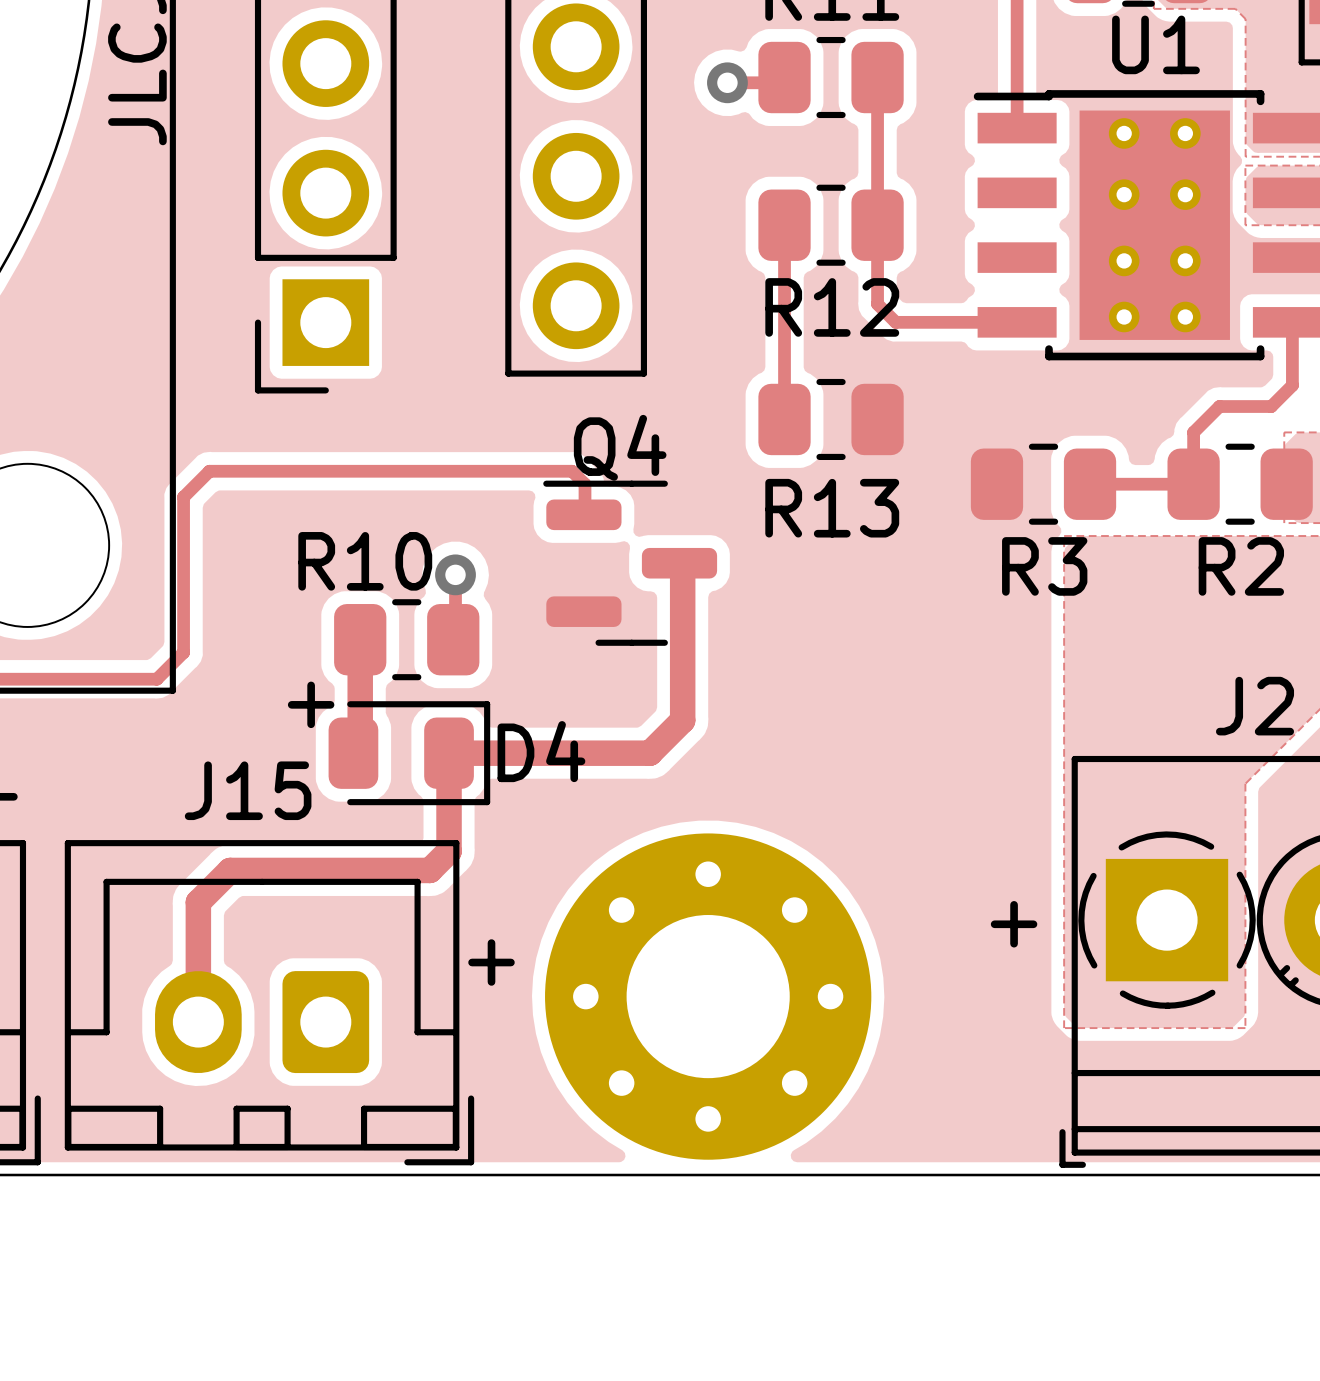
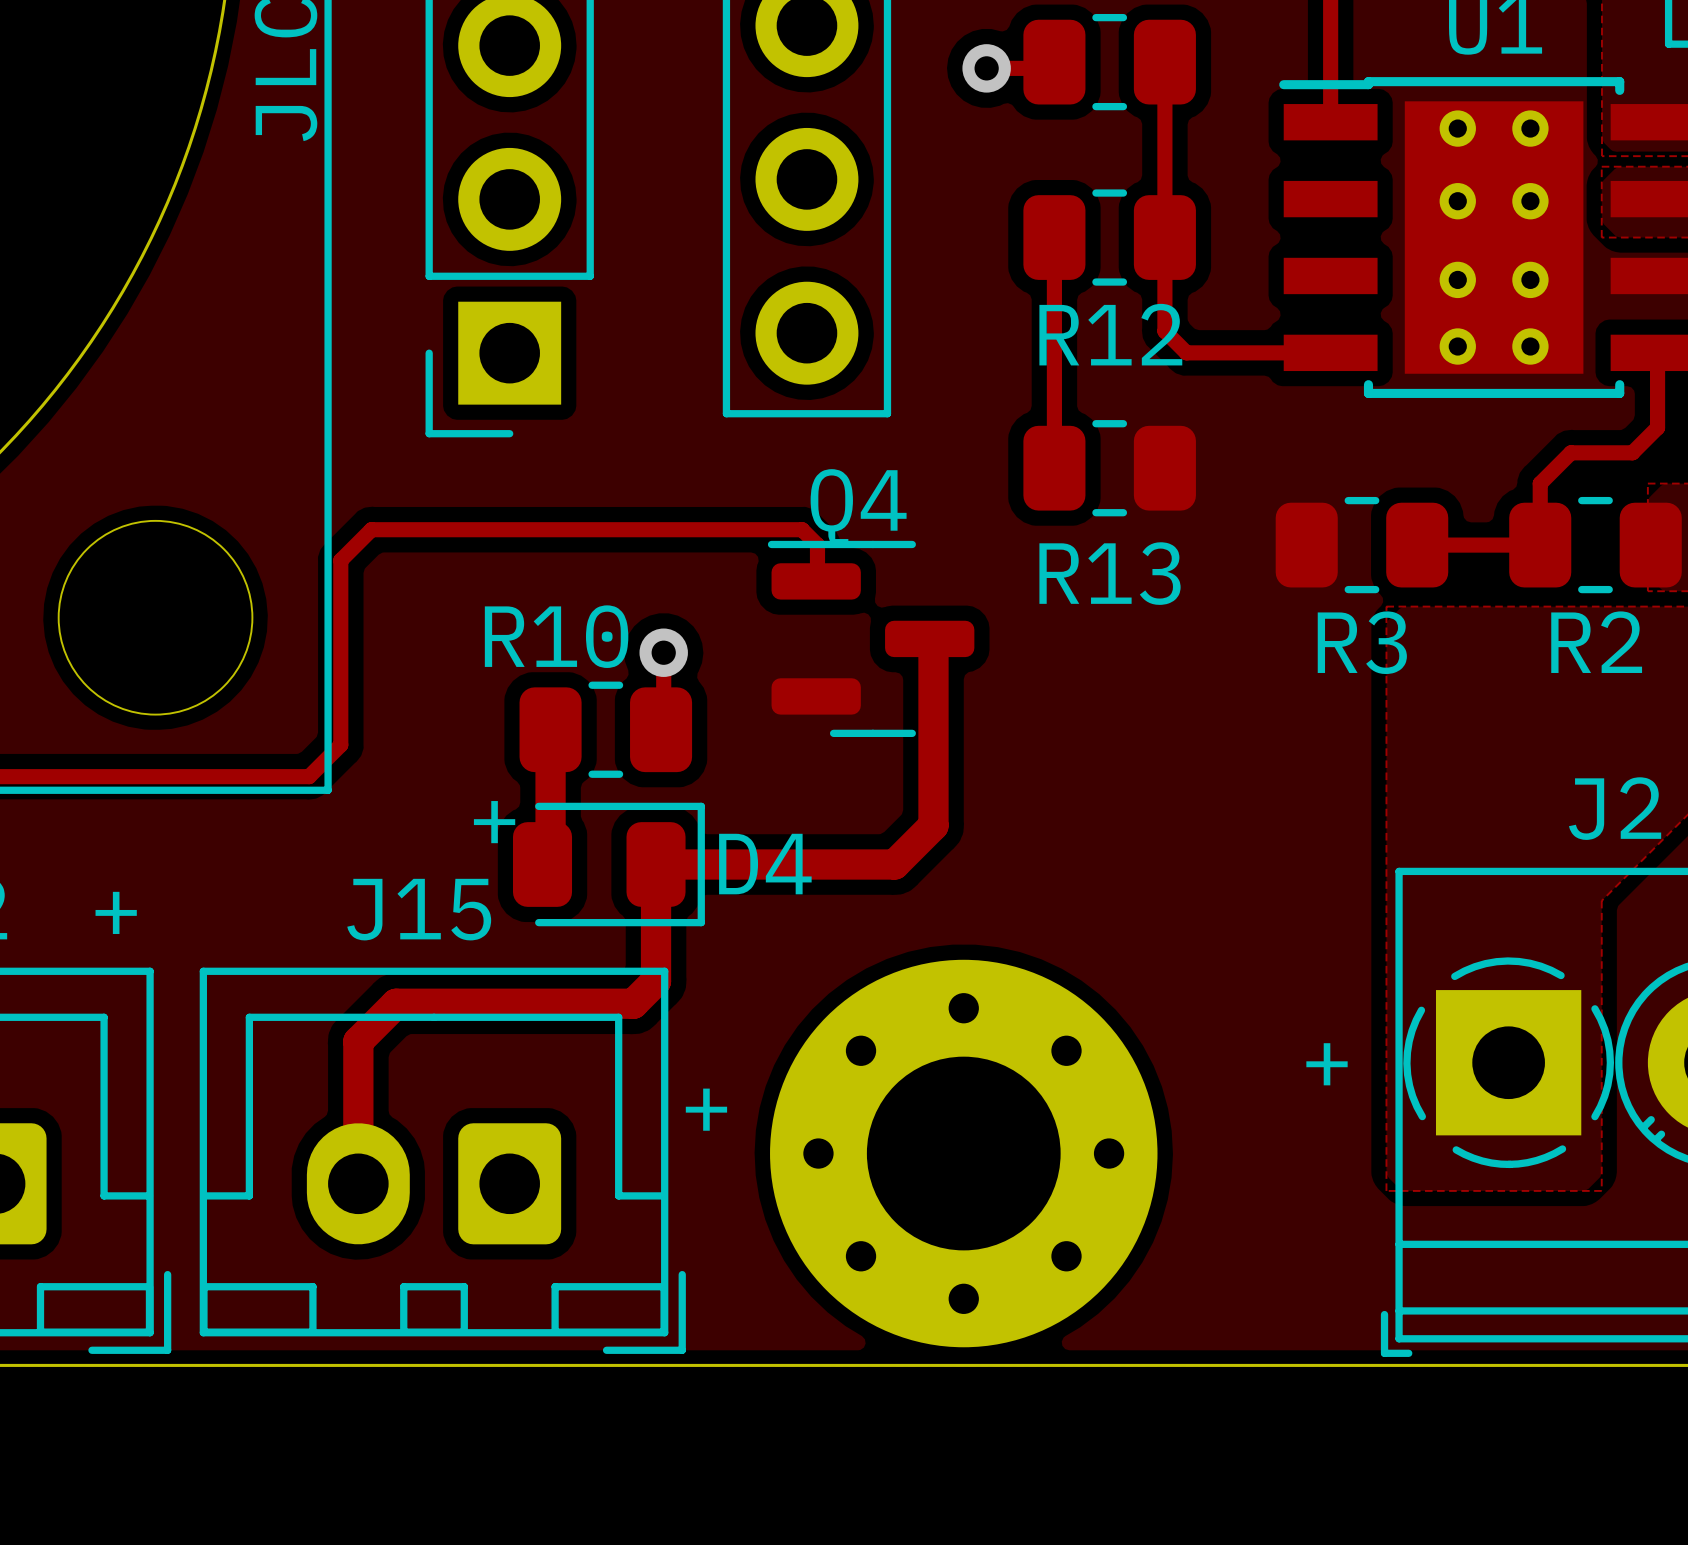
text position: + (311, 704) -> + (494, 822)

